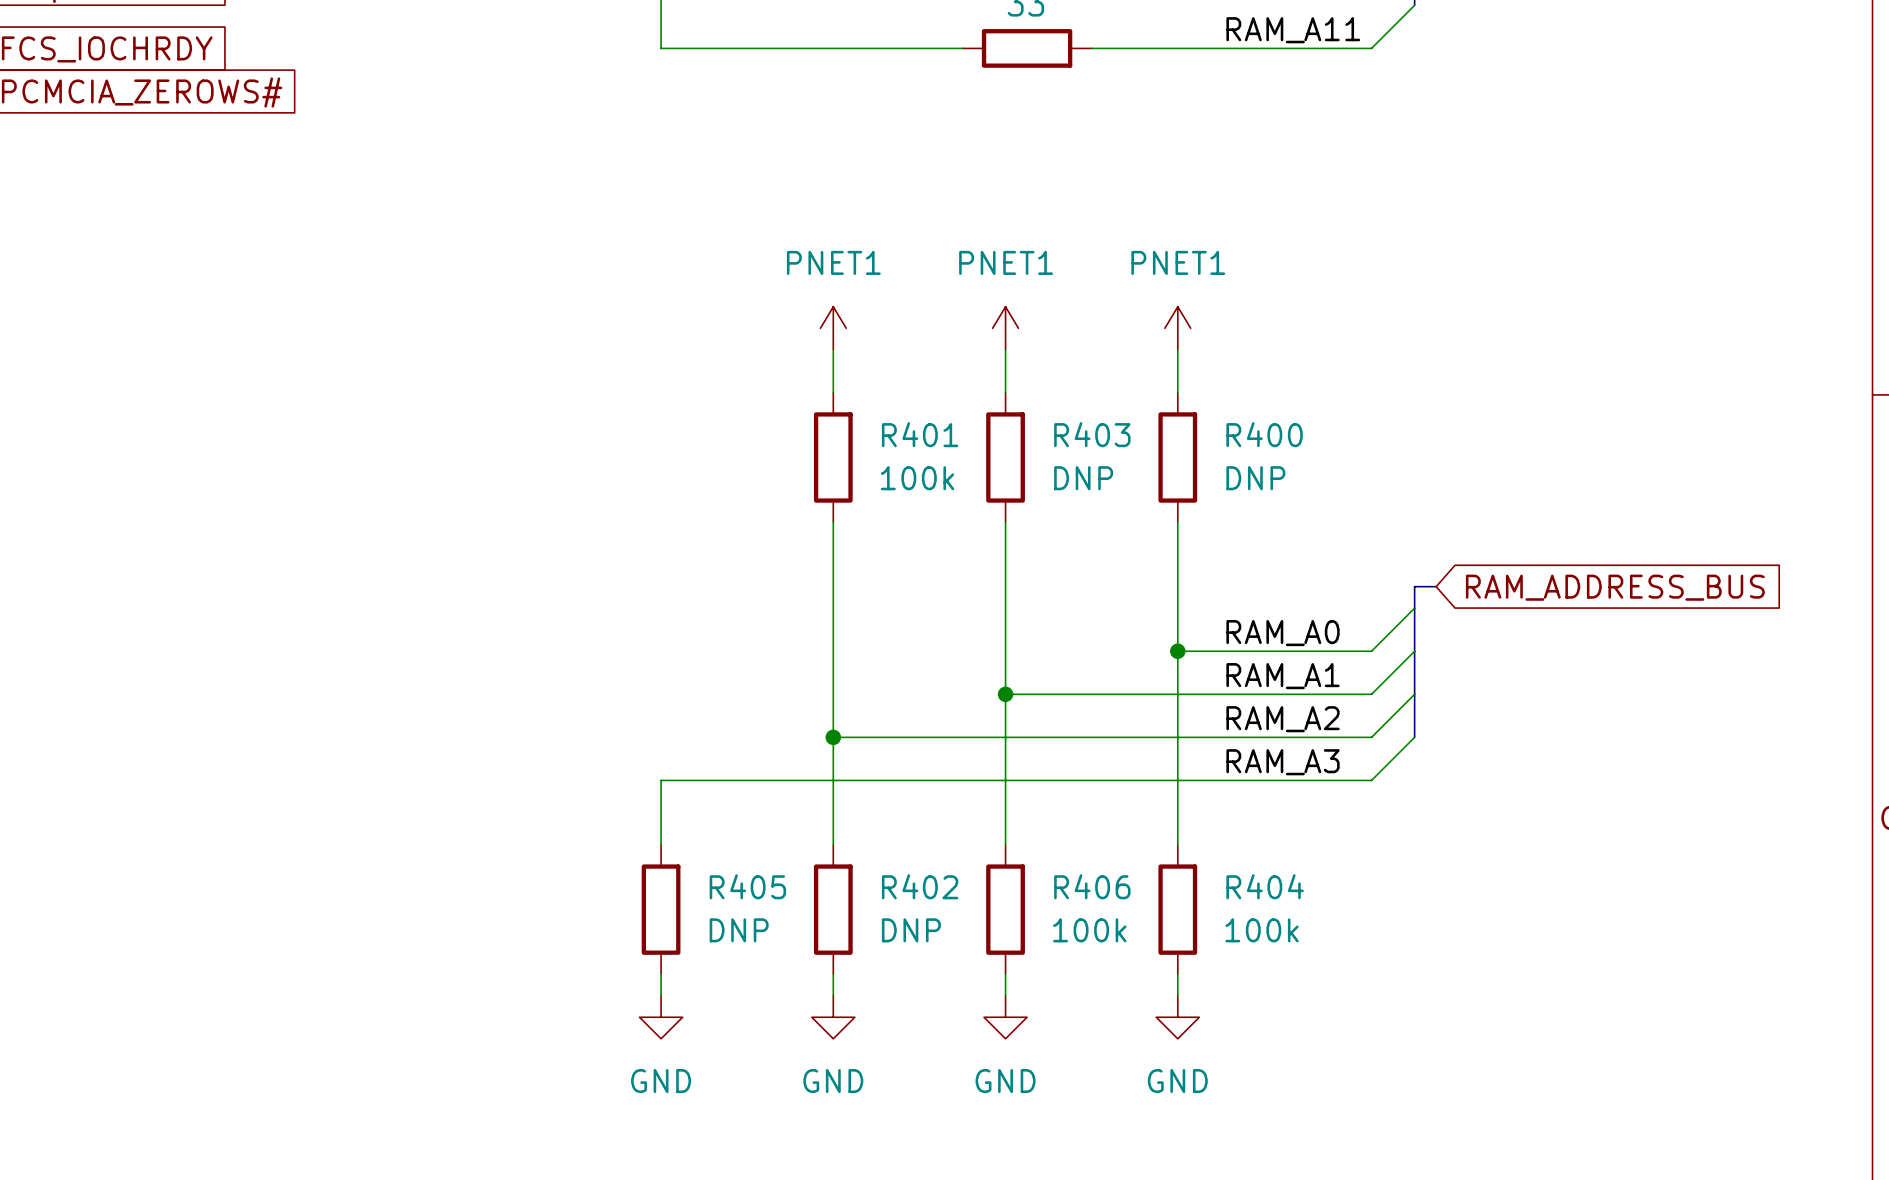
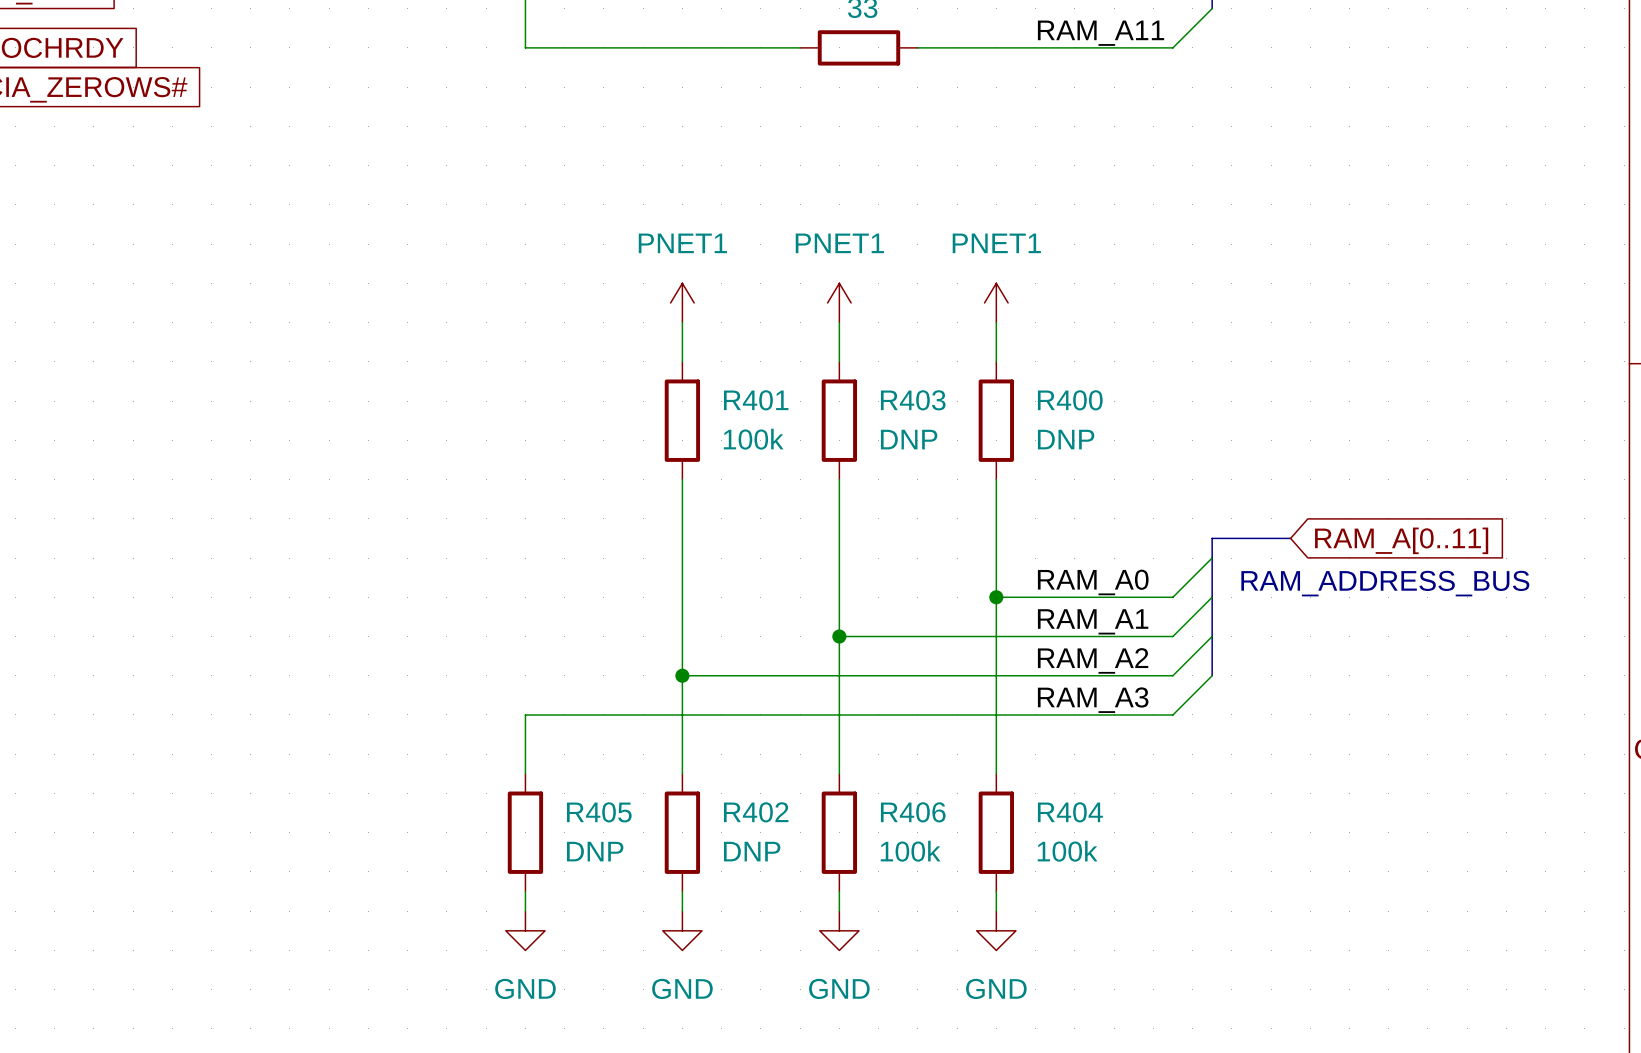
bus: none -> (1231, 538) (1290, 538)
global label: RAM_ADDRESS_BUS (1615, 587) -> none
global label: none -> RAM_A[0..11] (1401, 540)
text: none -> RAM_ADDRESS_BUS (1385, 583)

